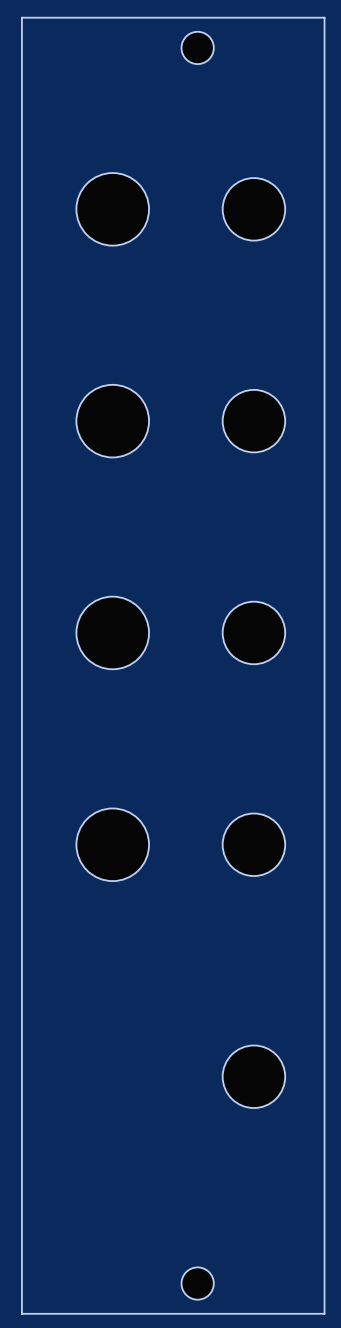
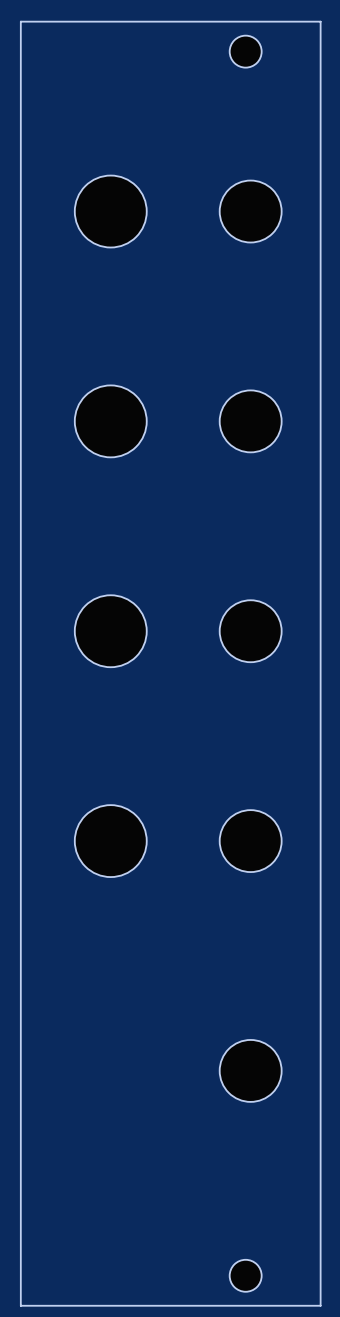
part position: (197, 47) -> (245, 51)
part position: (197, 1283) -> (245, 1275)

